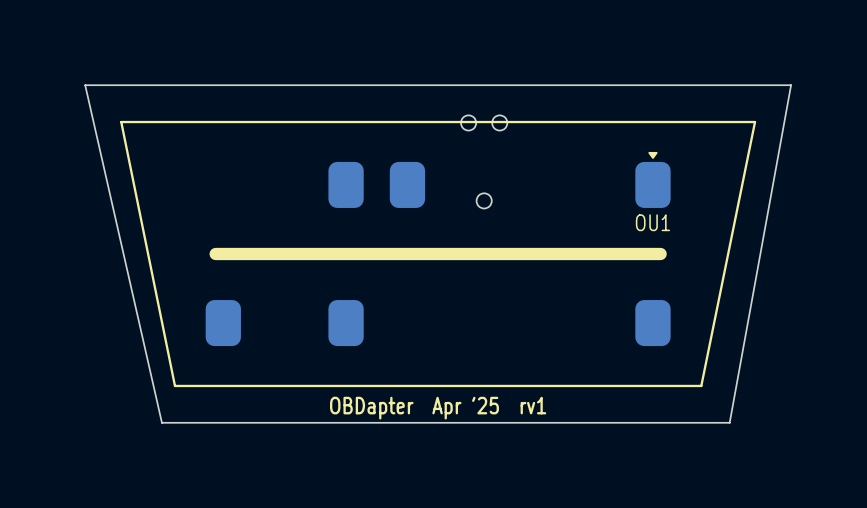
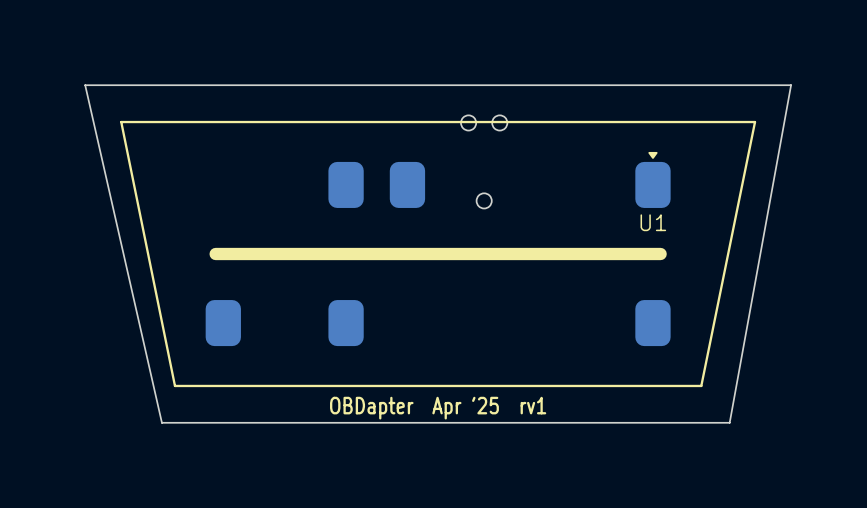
OU1 name: OU1 (652, 222) -> U1 (653, 222)

